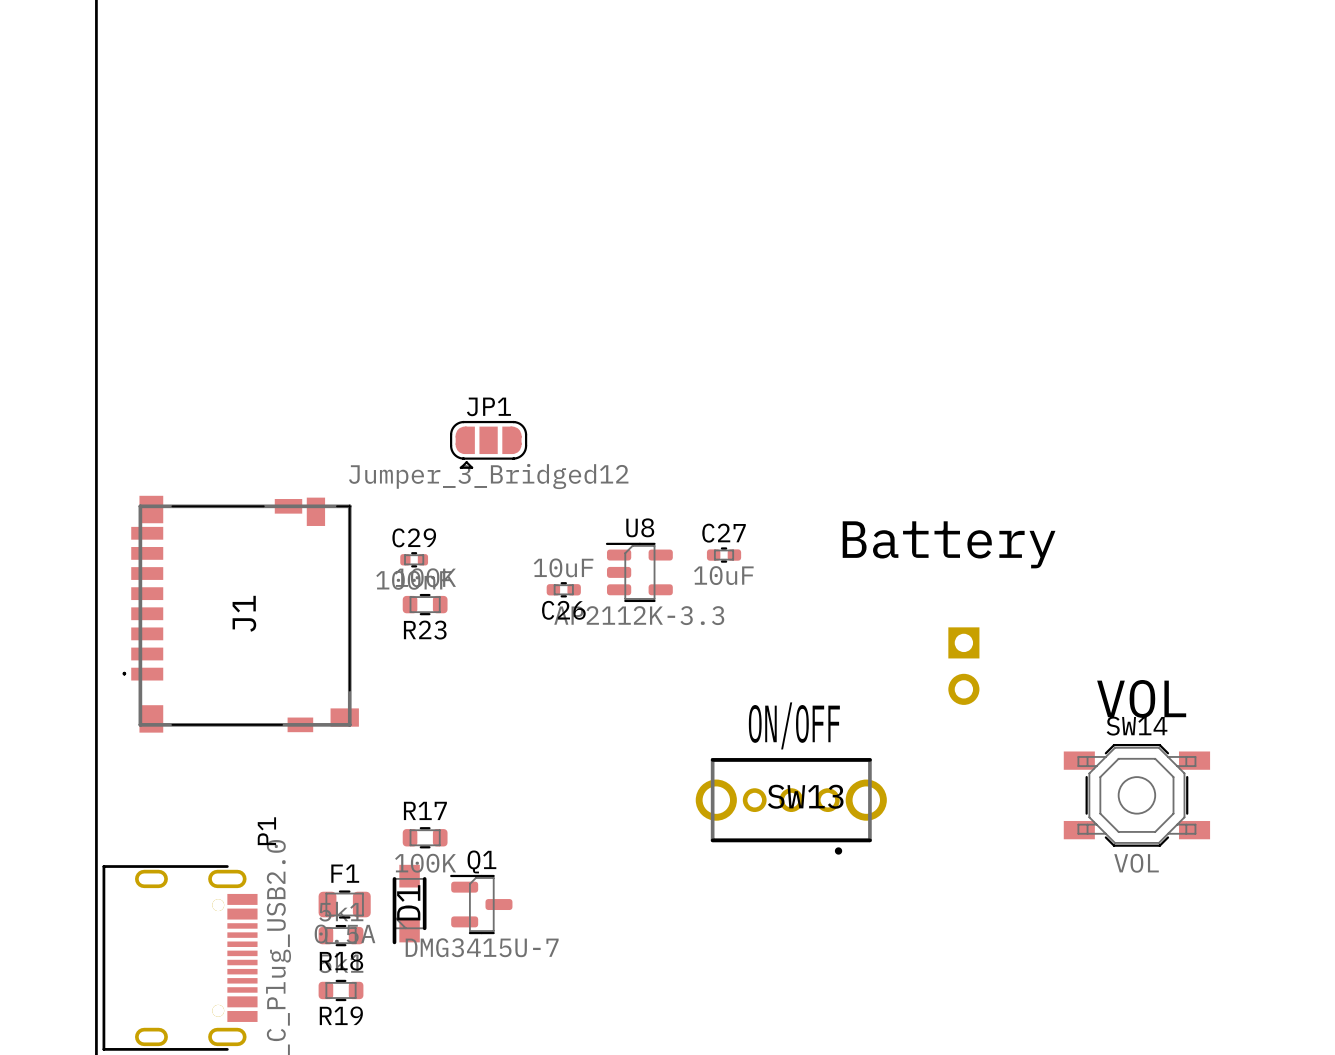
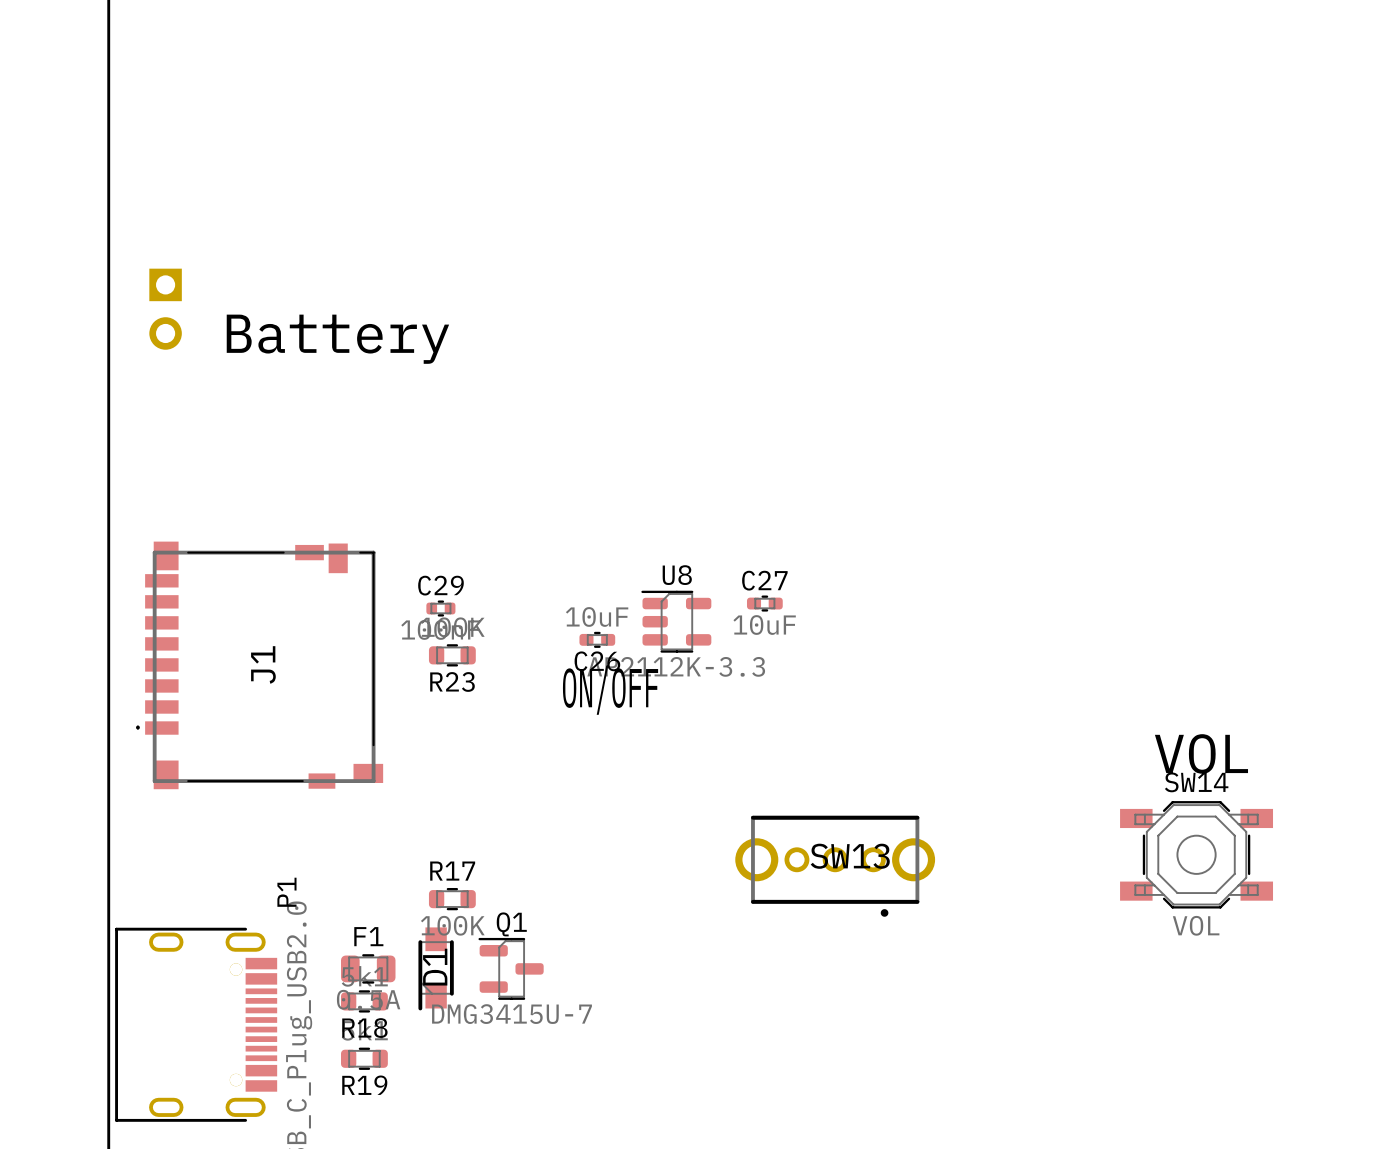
part: none -> (165, 309)
text: none -> Battery (337, 339)
JP1: Jumper_3_Bridged12 (488, 444) -> none
text: Battery (949, 544) -> none
part: (963, 666) -> none
text position: ON/OFF (794, 725) -> ON/OFF (610, 690)

